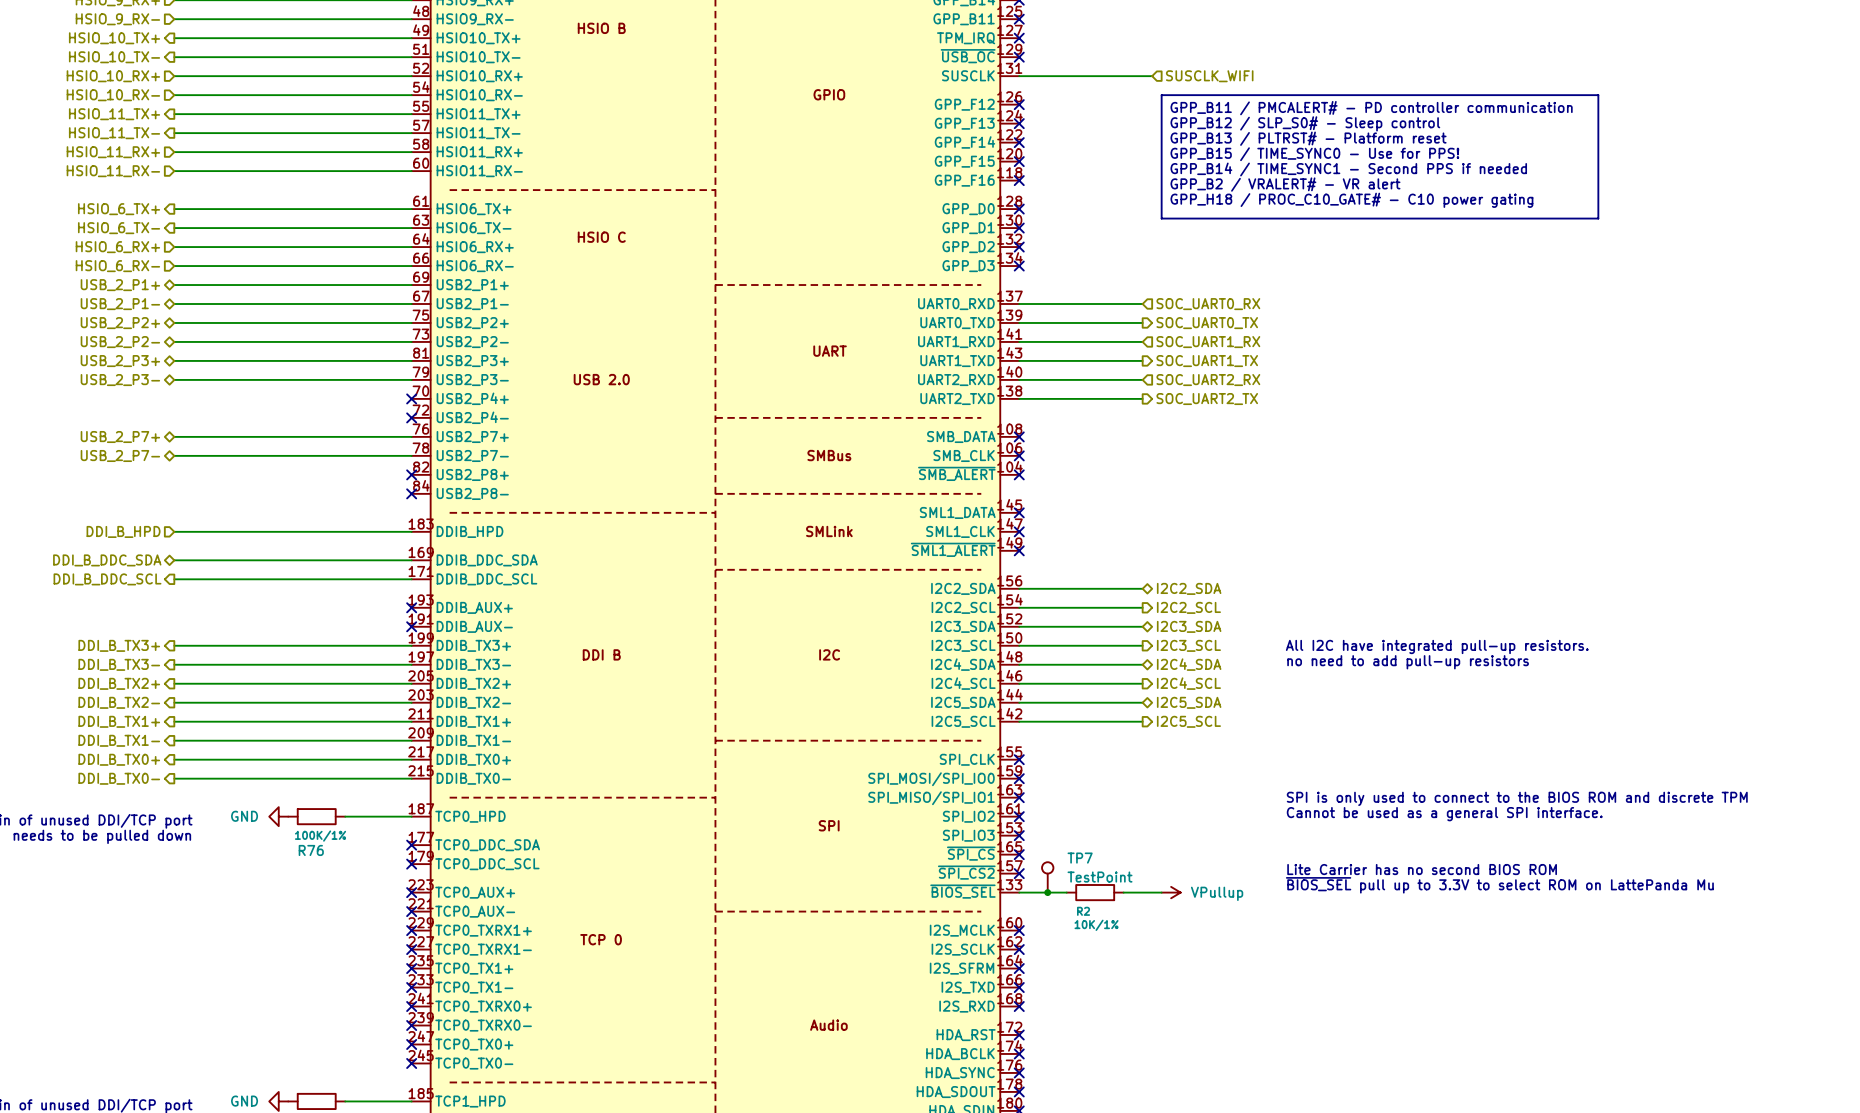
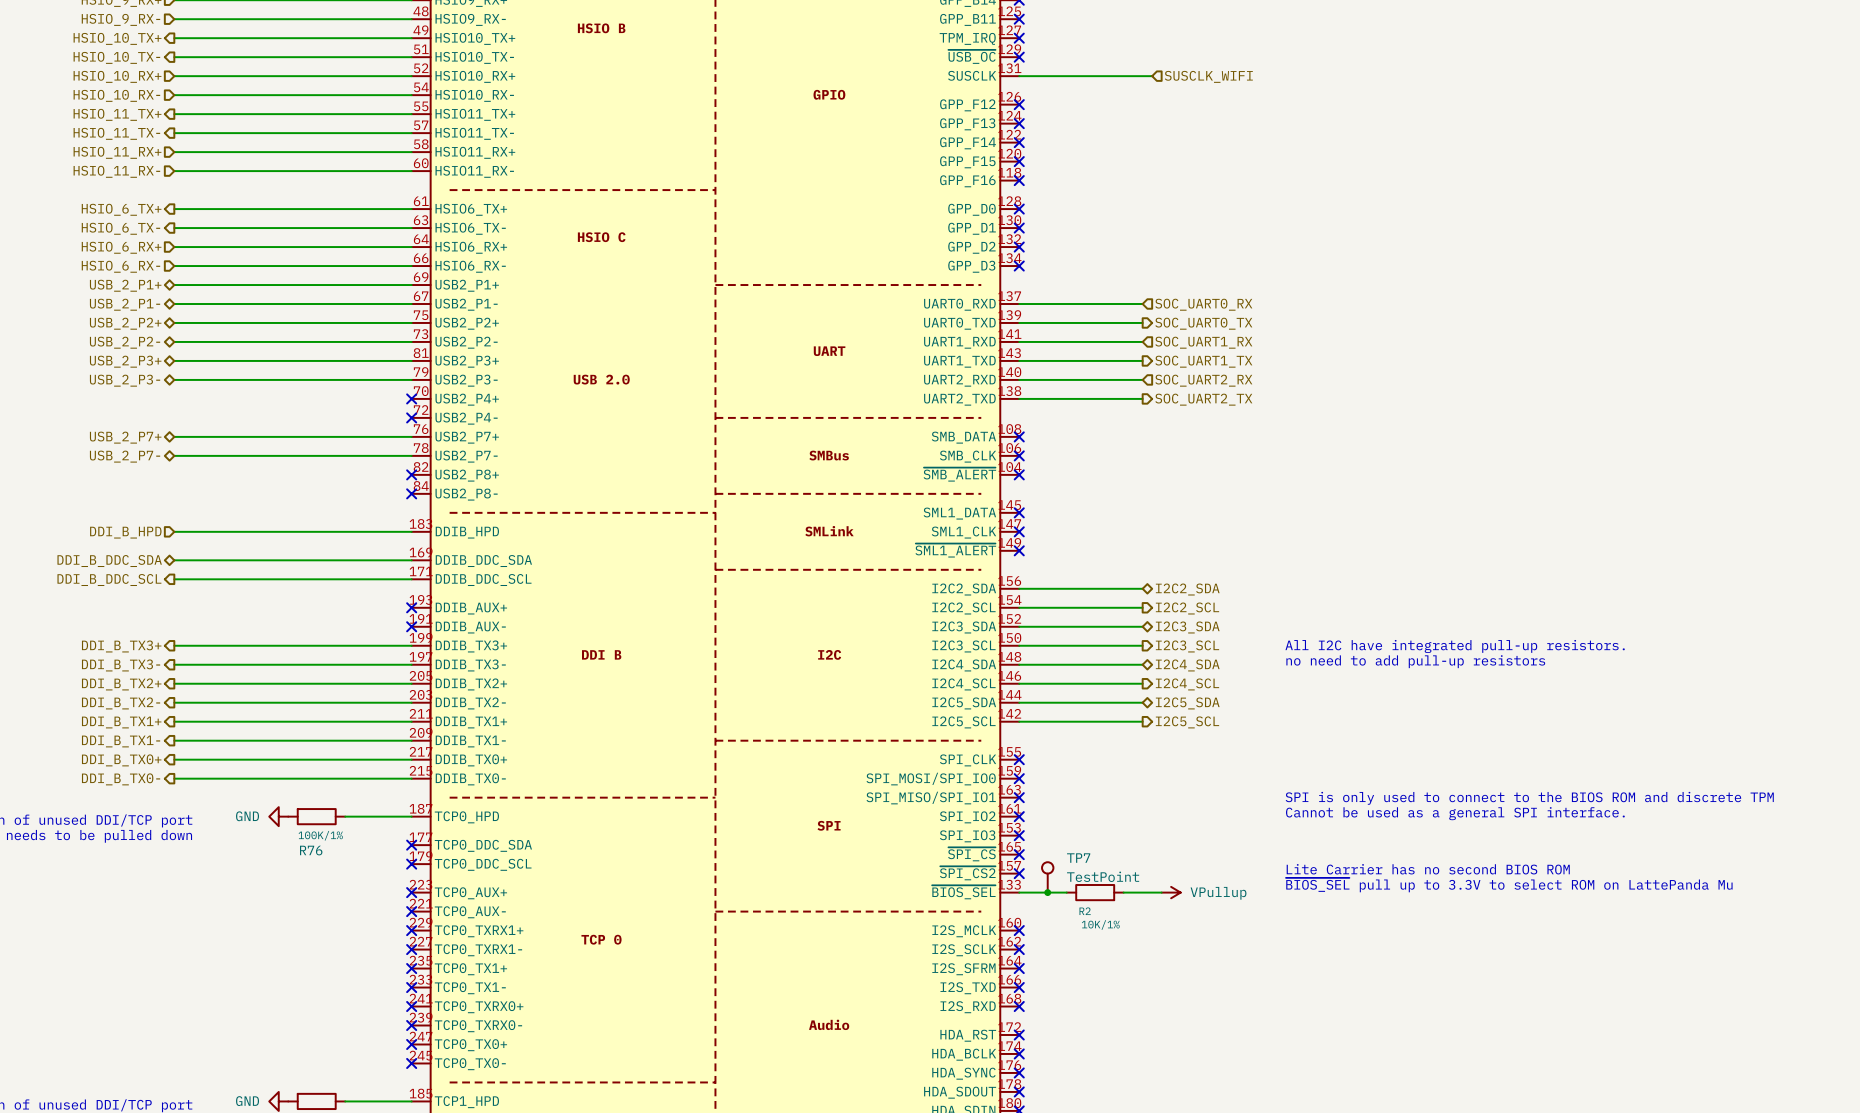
line: (1161, 95) (1598, 95) (1598, 218) (1161, 218) (1161, 95) -> none
text: GPP_B11 / PMCALERT# - PD controller communication (1371, 108) -> none
text: GPP_B12 / SLP_S0# - Sleep control (1305, 123) -> none
text: GPP_B13 / PLTRST# - Platform reset (1308, 138) -> none
text: GPP_B15 / TIME_SYNC0 - Use for PPS! (1314, 154) -> none
text: GPP_B14 / TIME_SYNC1 - Second PPS if needed (1348, 169) -> none
text: GPP_B2 / VRALERT# - VR alert (1285, 184) -> none
text: GPP_H18 / PROC_C10_GATE# - C10 power gating (1351, 200) -> none

